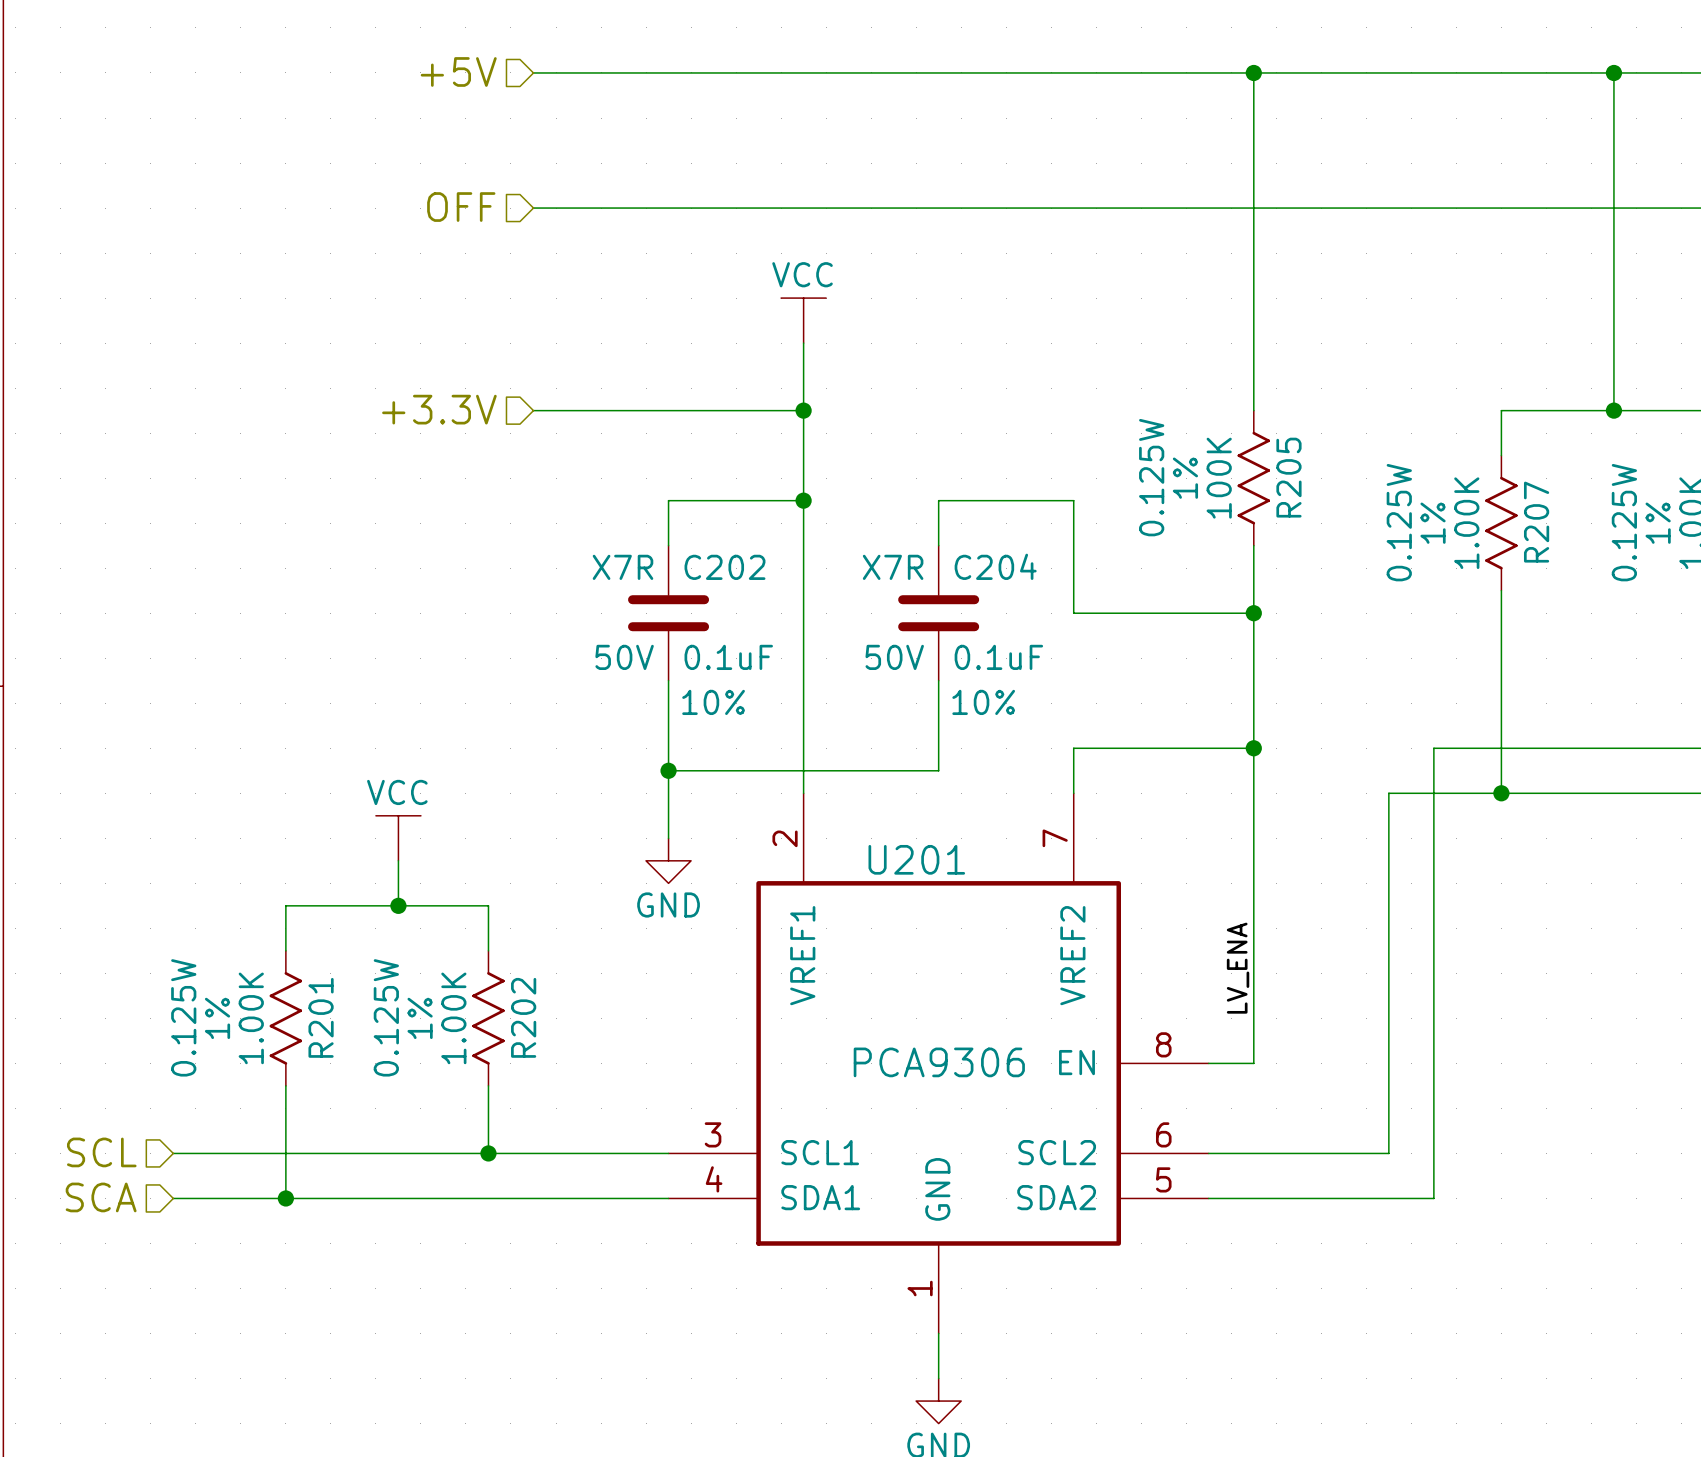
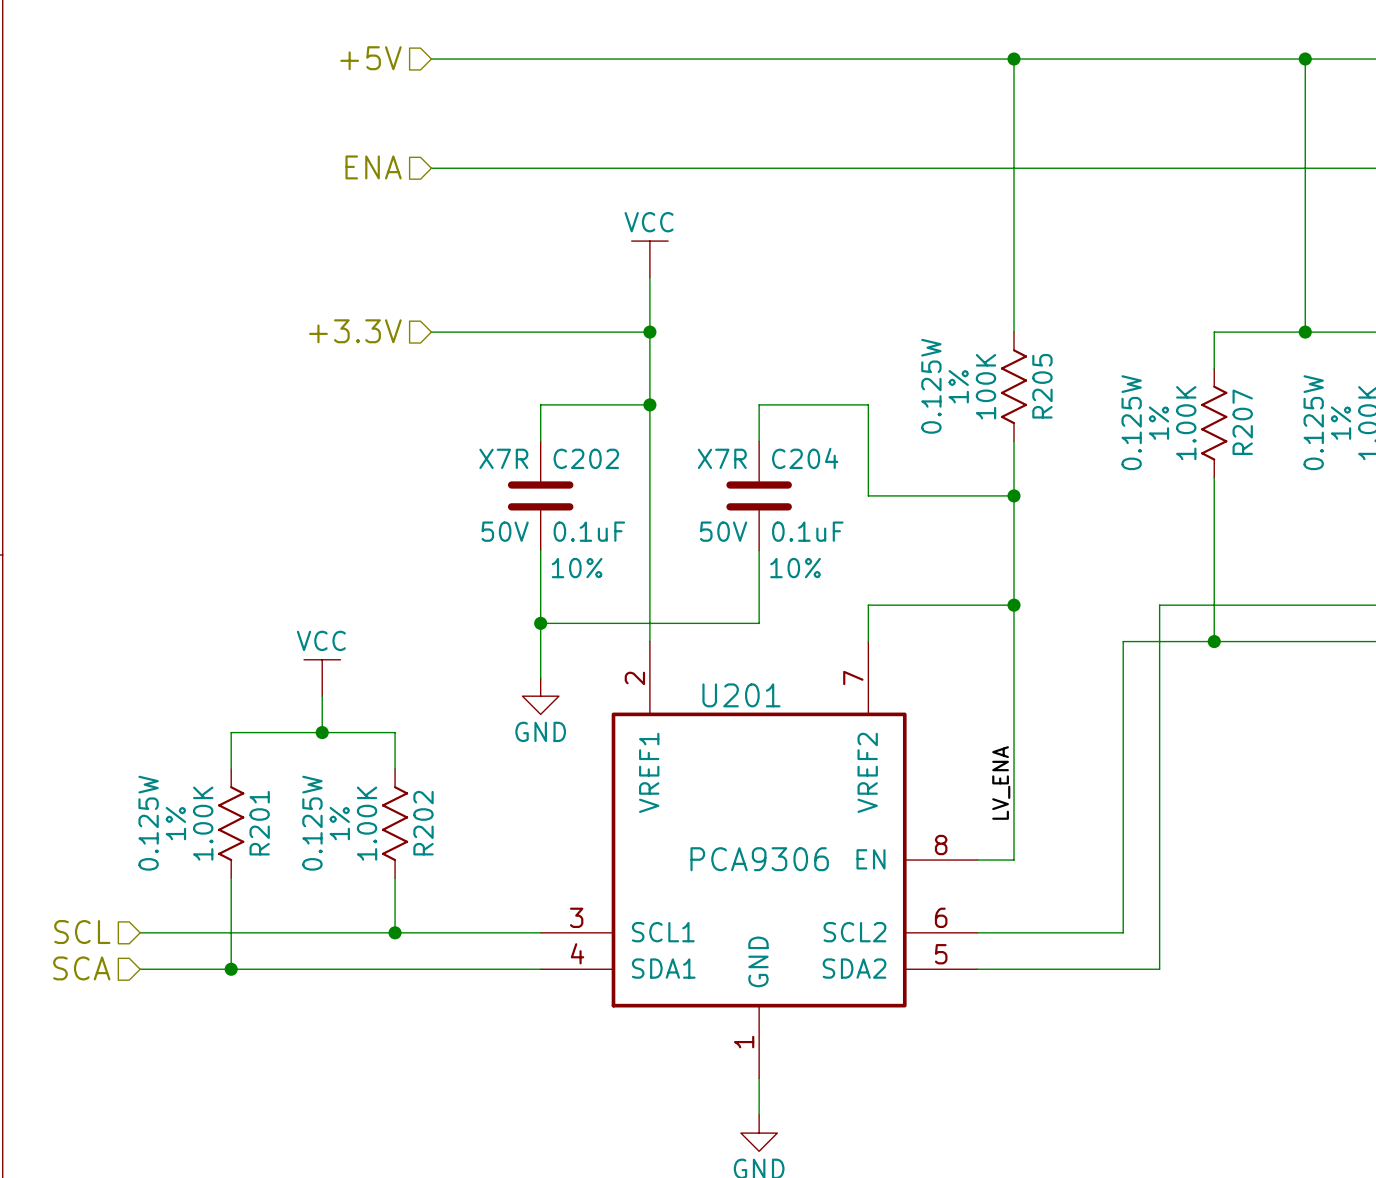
hierarchical label: OFF (461, 207) -> ENA (373, 167)

